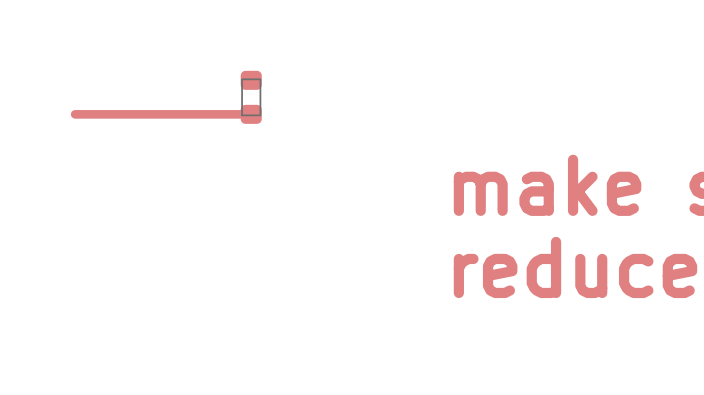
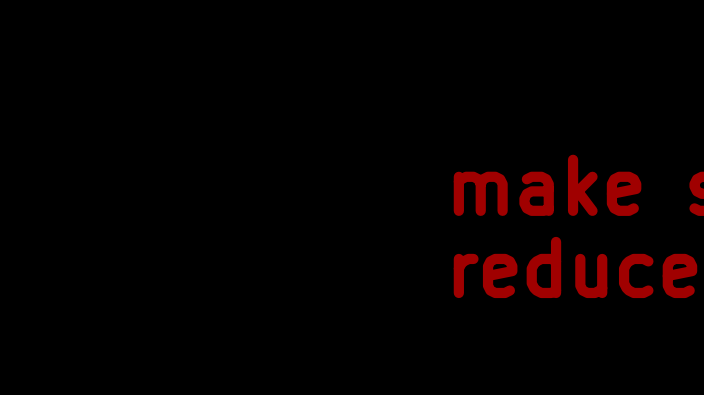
part: (251, 97) -> none
track: (75, 114) (251, 114) -> none

